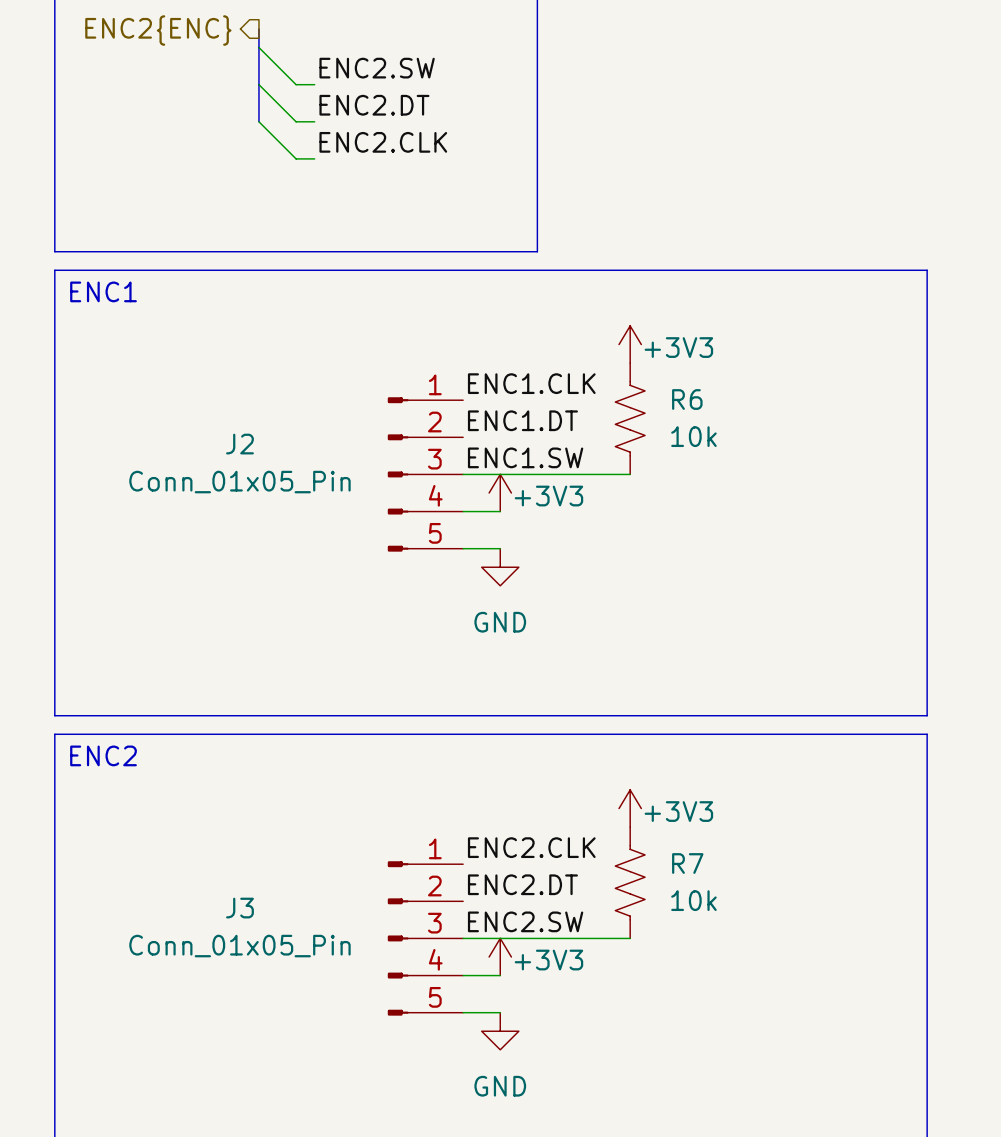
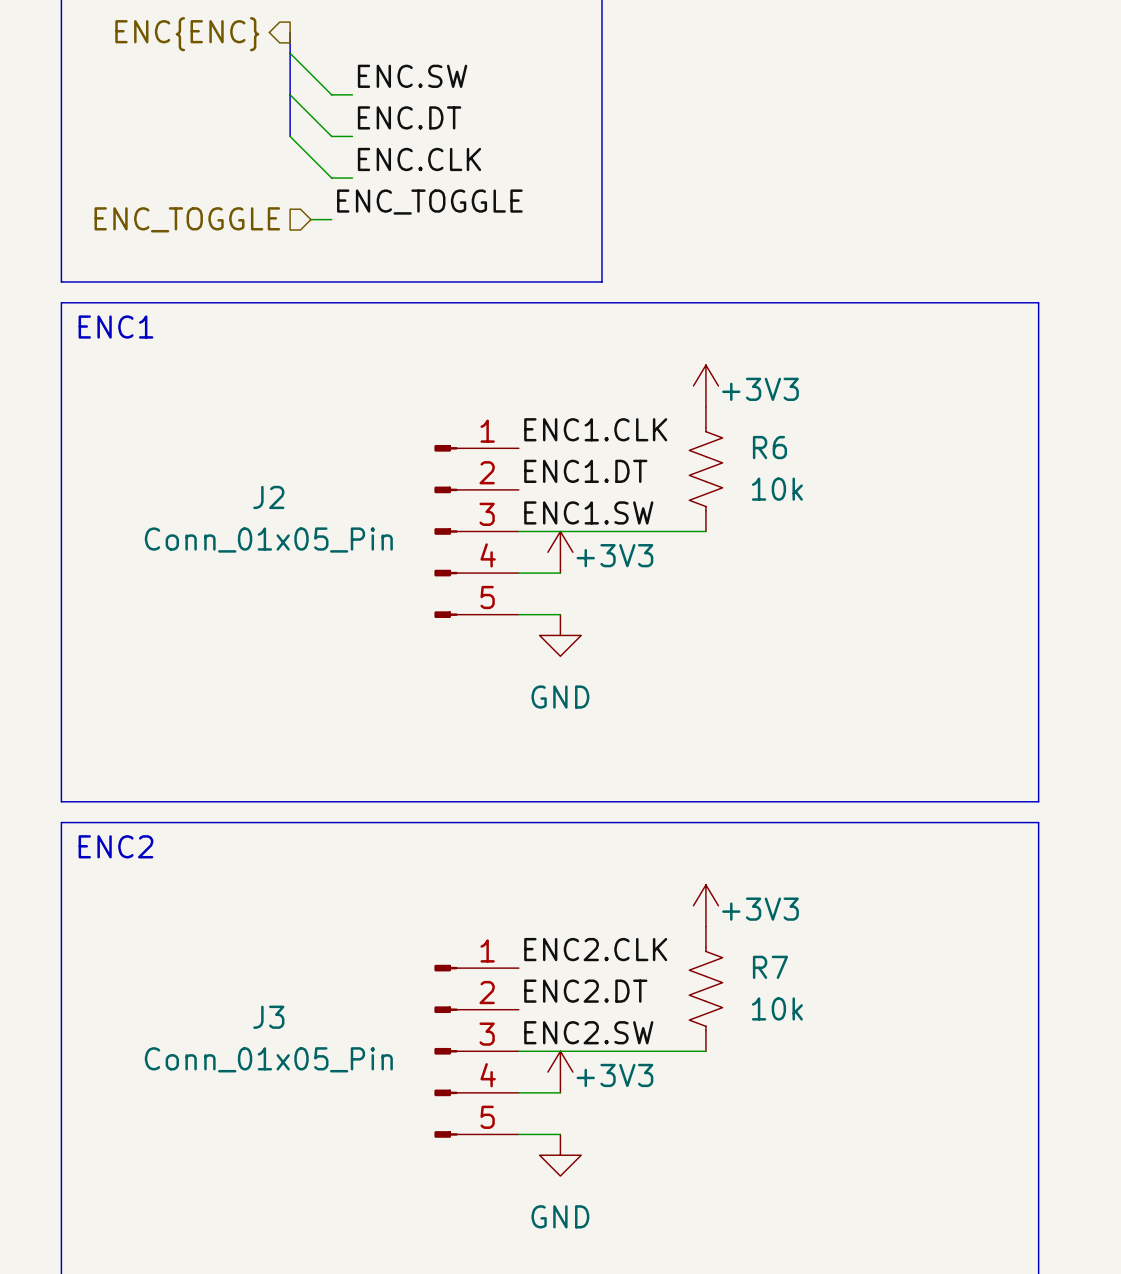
hierarchical label: ENC2{ENC} (158, 30) -> ENC{ENC} (187, 34)
label: ENC2.SW (377, 68) -> ENC.SW (412, 76)
label: ENC2.DT (374, 105) -> ENC.DT (409, 117)
label: ENC2.CLK (383, 142) -> ENC.CLK (419, 159)
label: none -> ENC_TOGGLE (429, 202)
hierarchical label: none -> ENC_TOGGLE (187, 219)
wire: none -> (310, 219) (331, 219)

